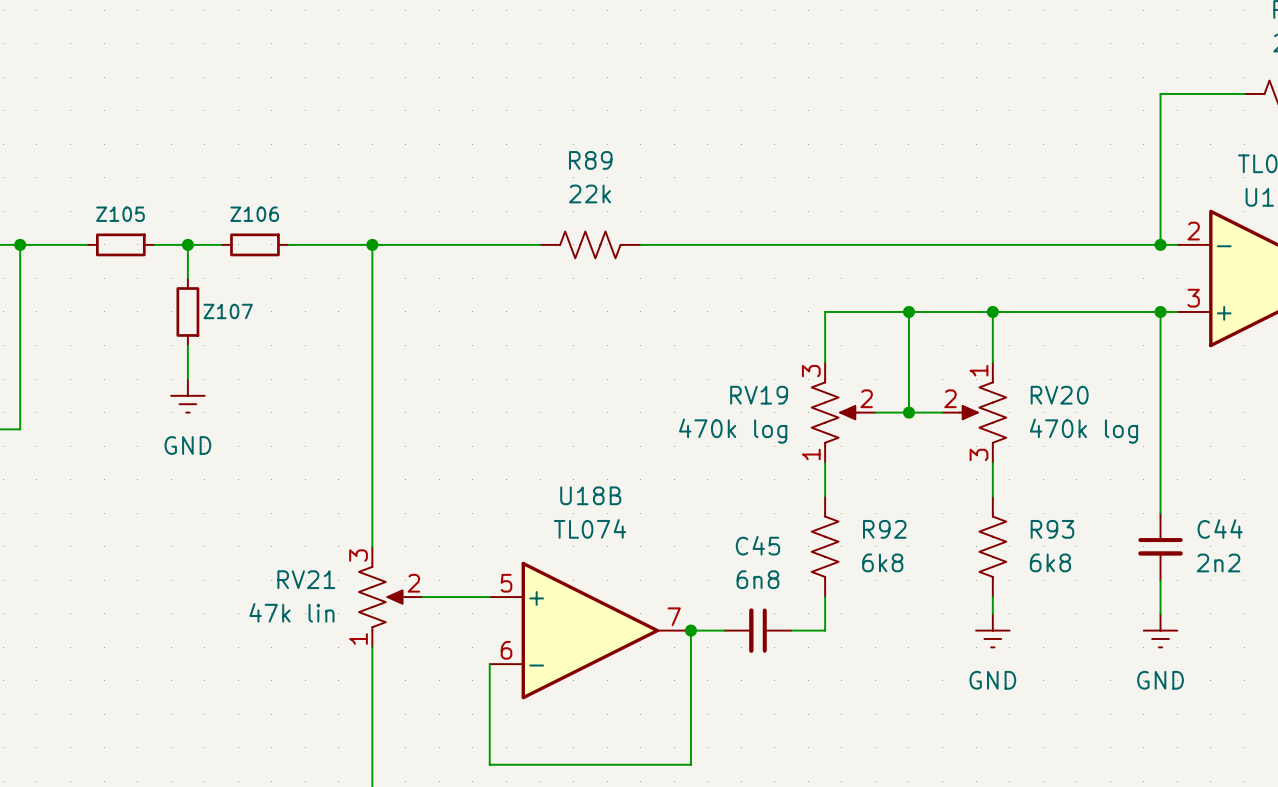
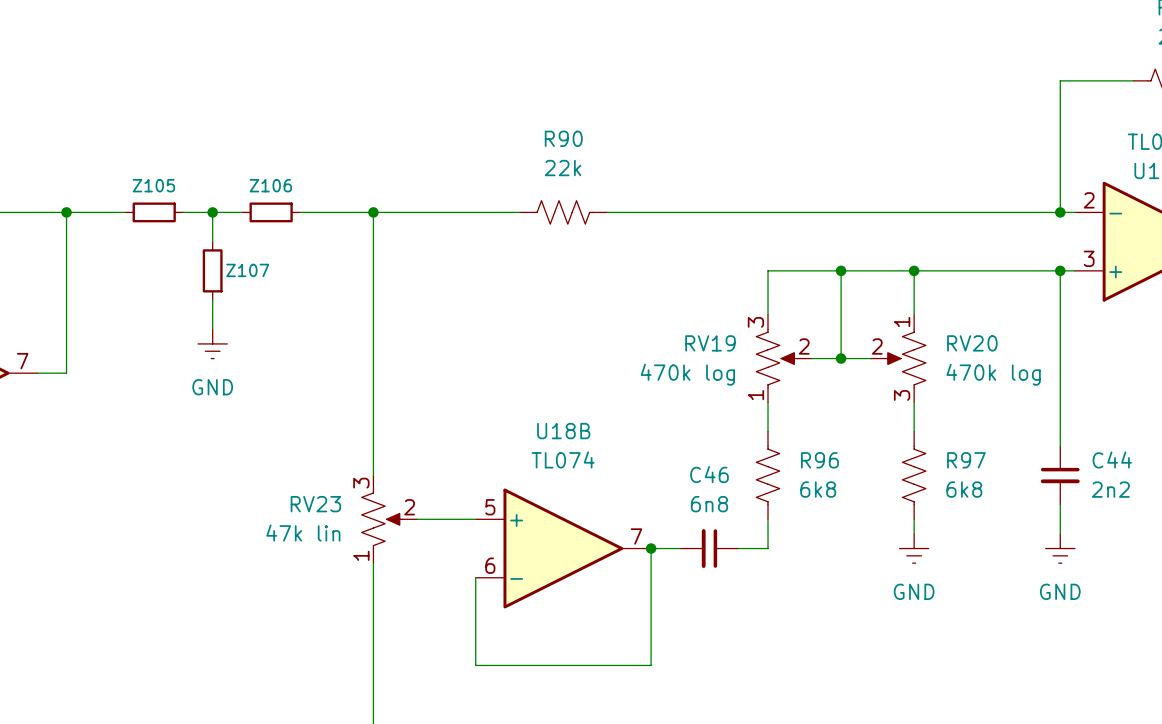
R89 name: R89 (590, 160) -> R90 (563, 138)
R92 name: R92 (884, 529) -> R96 (819, 460)
R93 name: R93 (1052, 529) -> R97 (966, 460)
C45 name: C45 (757, 545) -> C46 (709, 474)
RV21 name: RV21 (306, 579) -> RV23 (315, 504)

